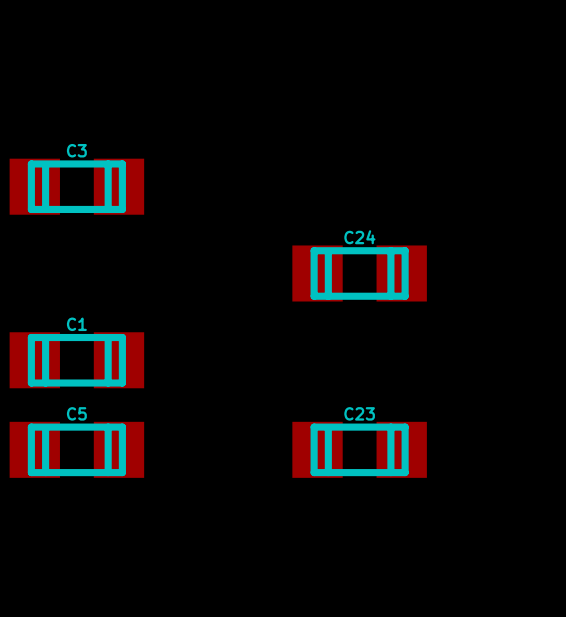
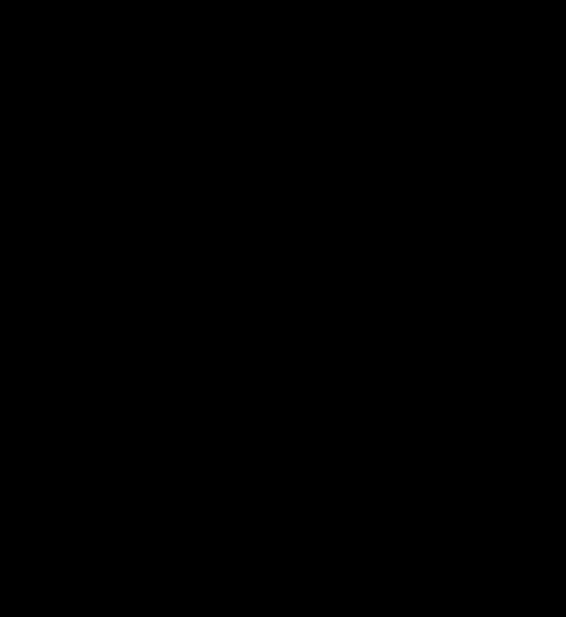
C3: (76, 186) -> none
C24: (359, 273) -> none
C1: (76, 360) -> none
C5: (76, 449) -> none
C23: (359, 449) -> none

